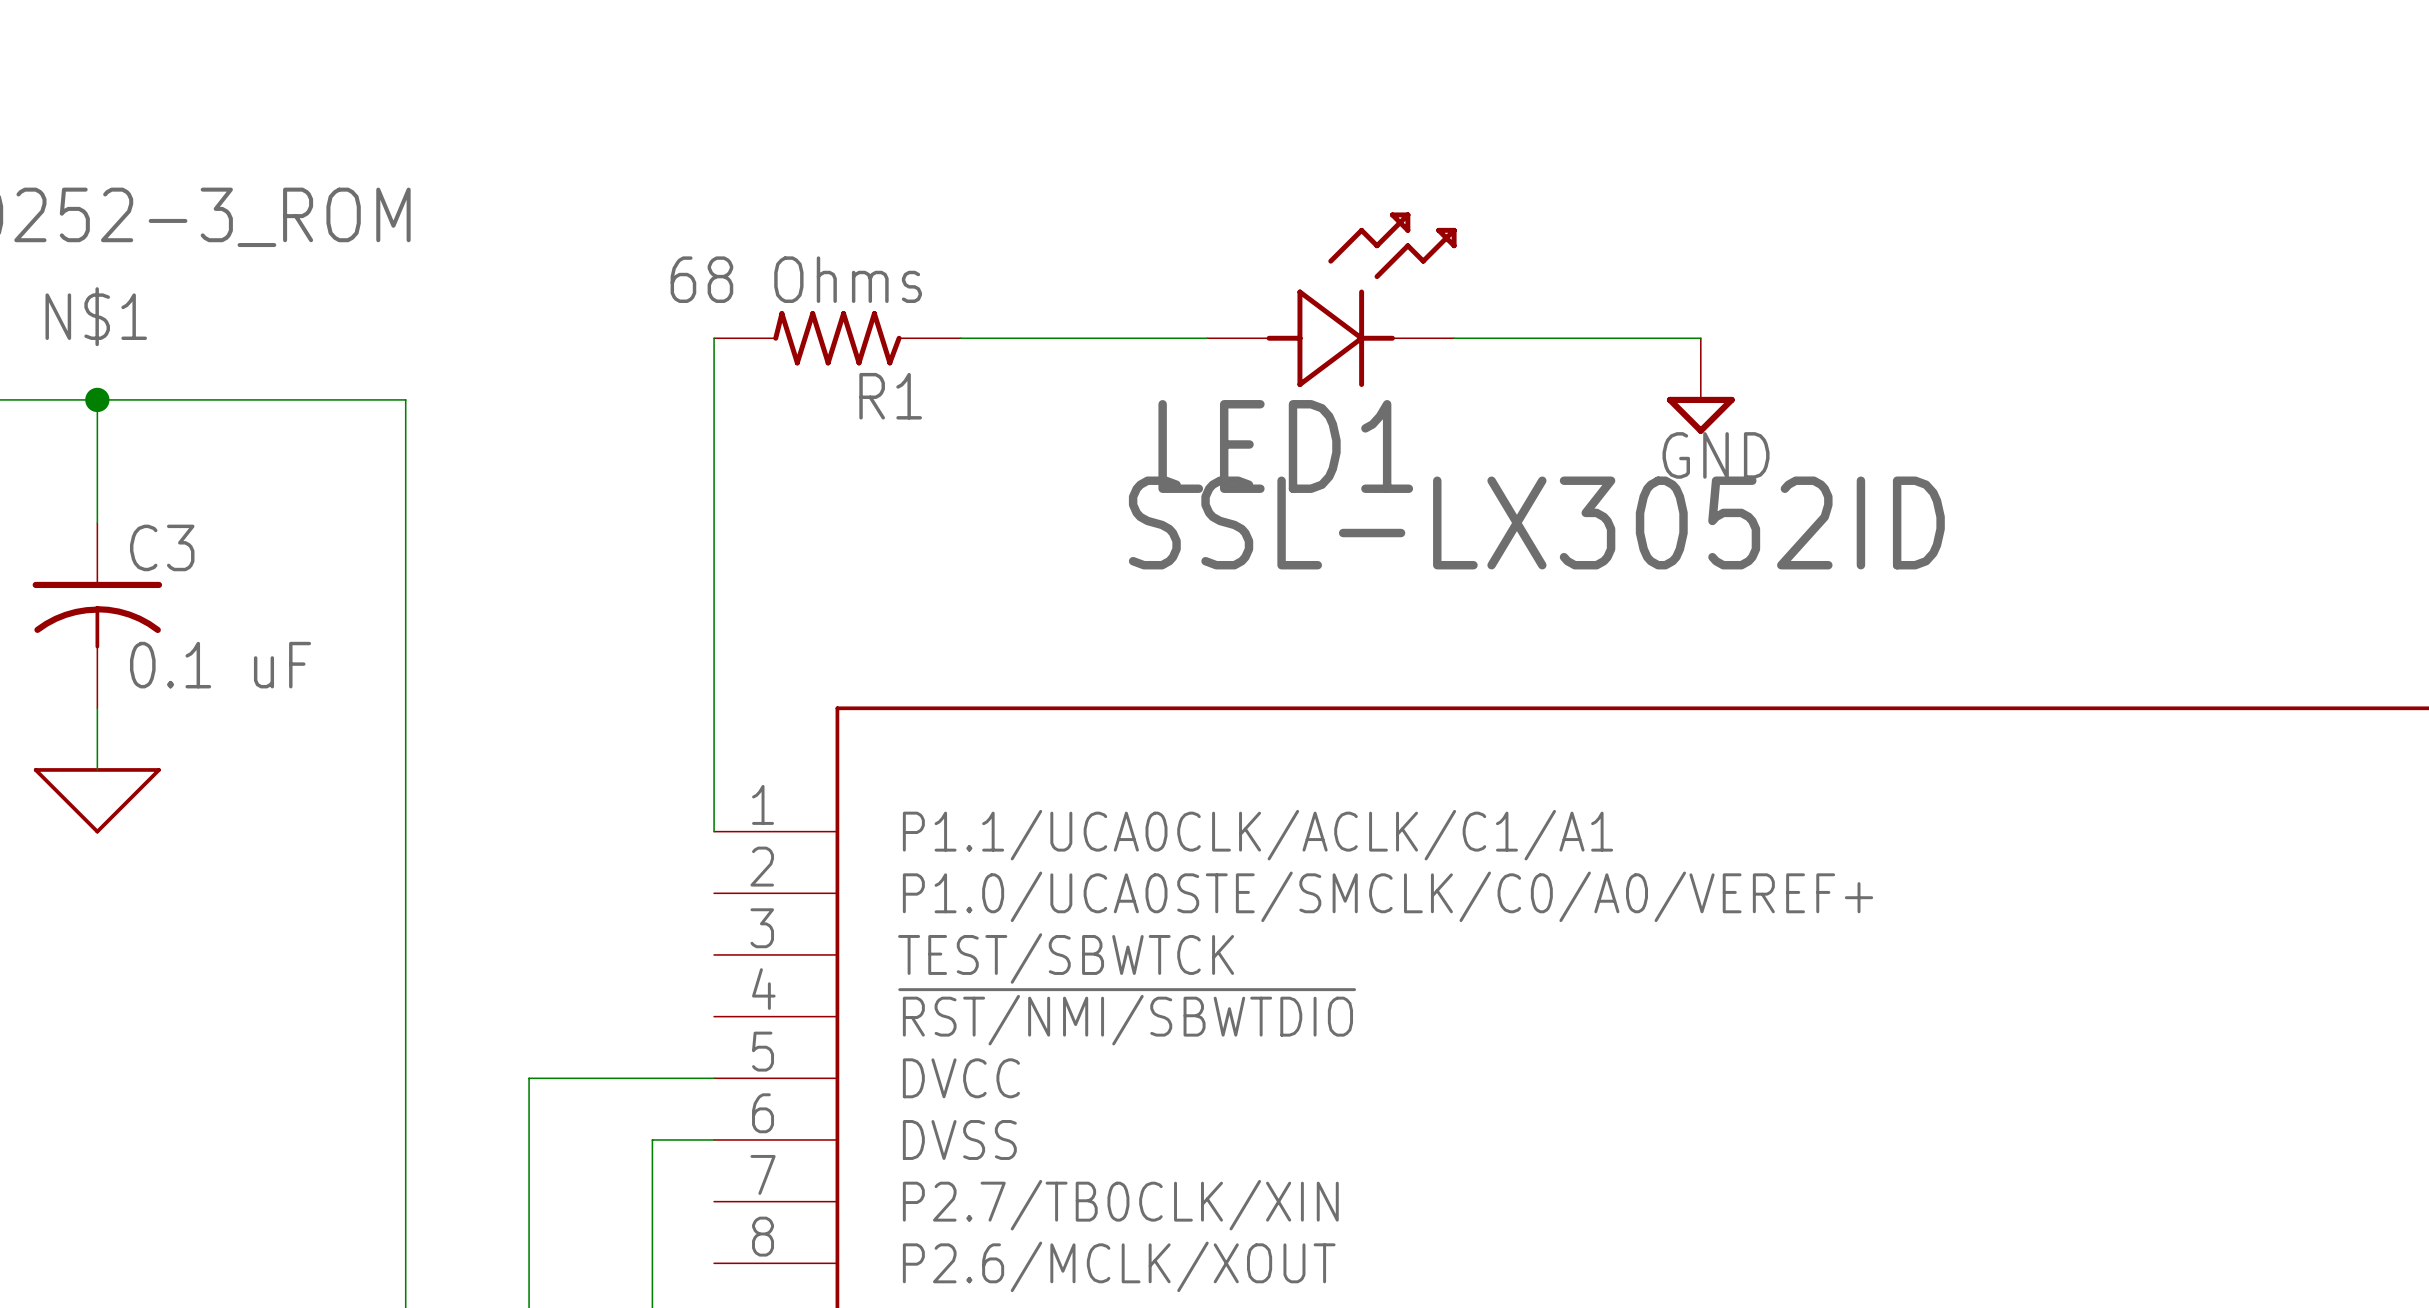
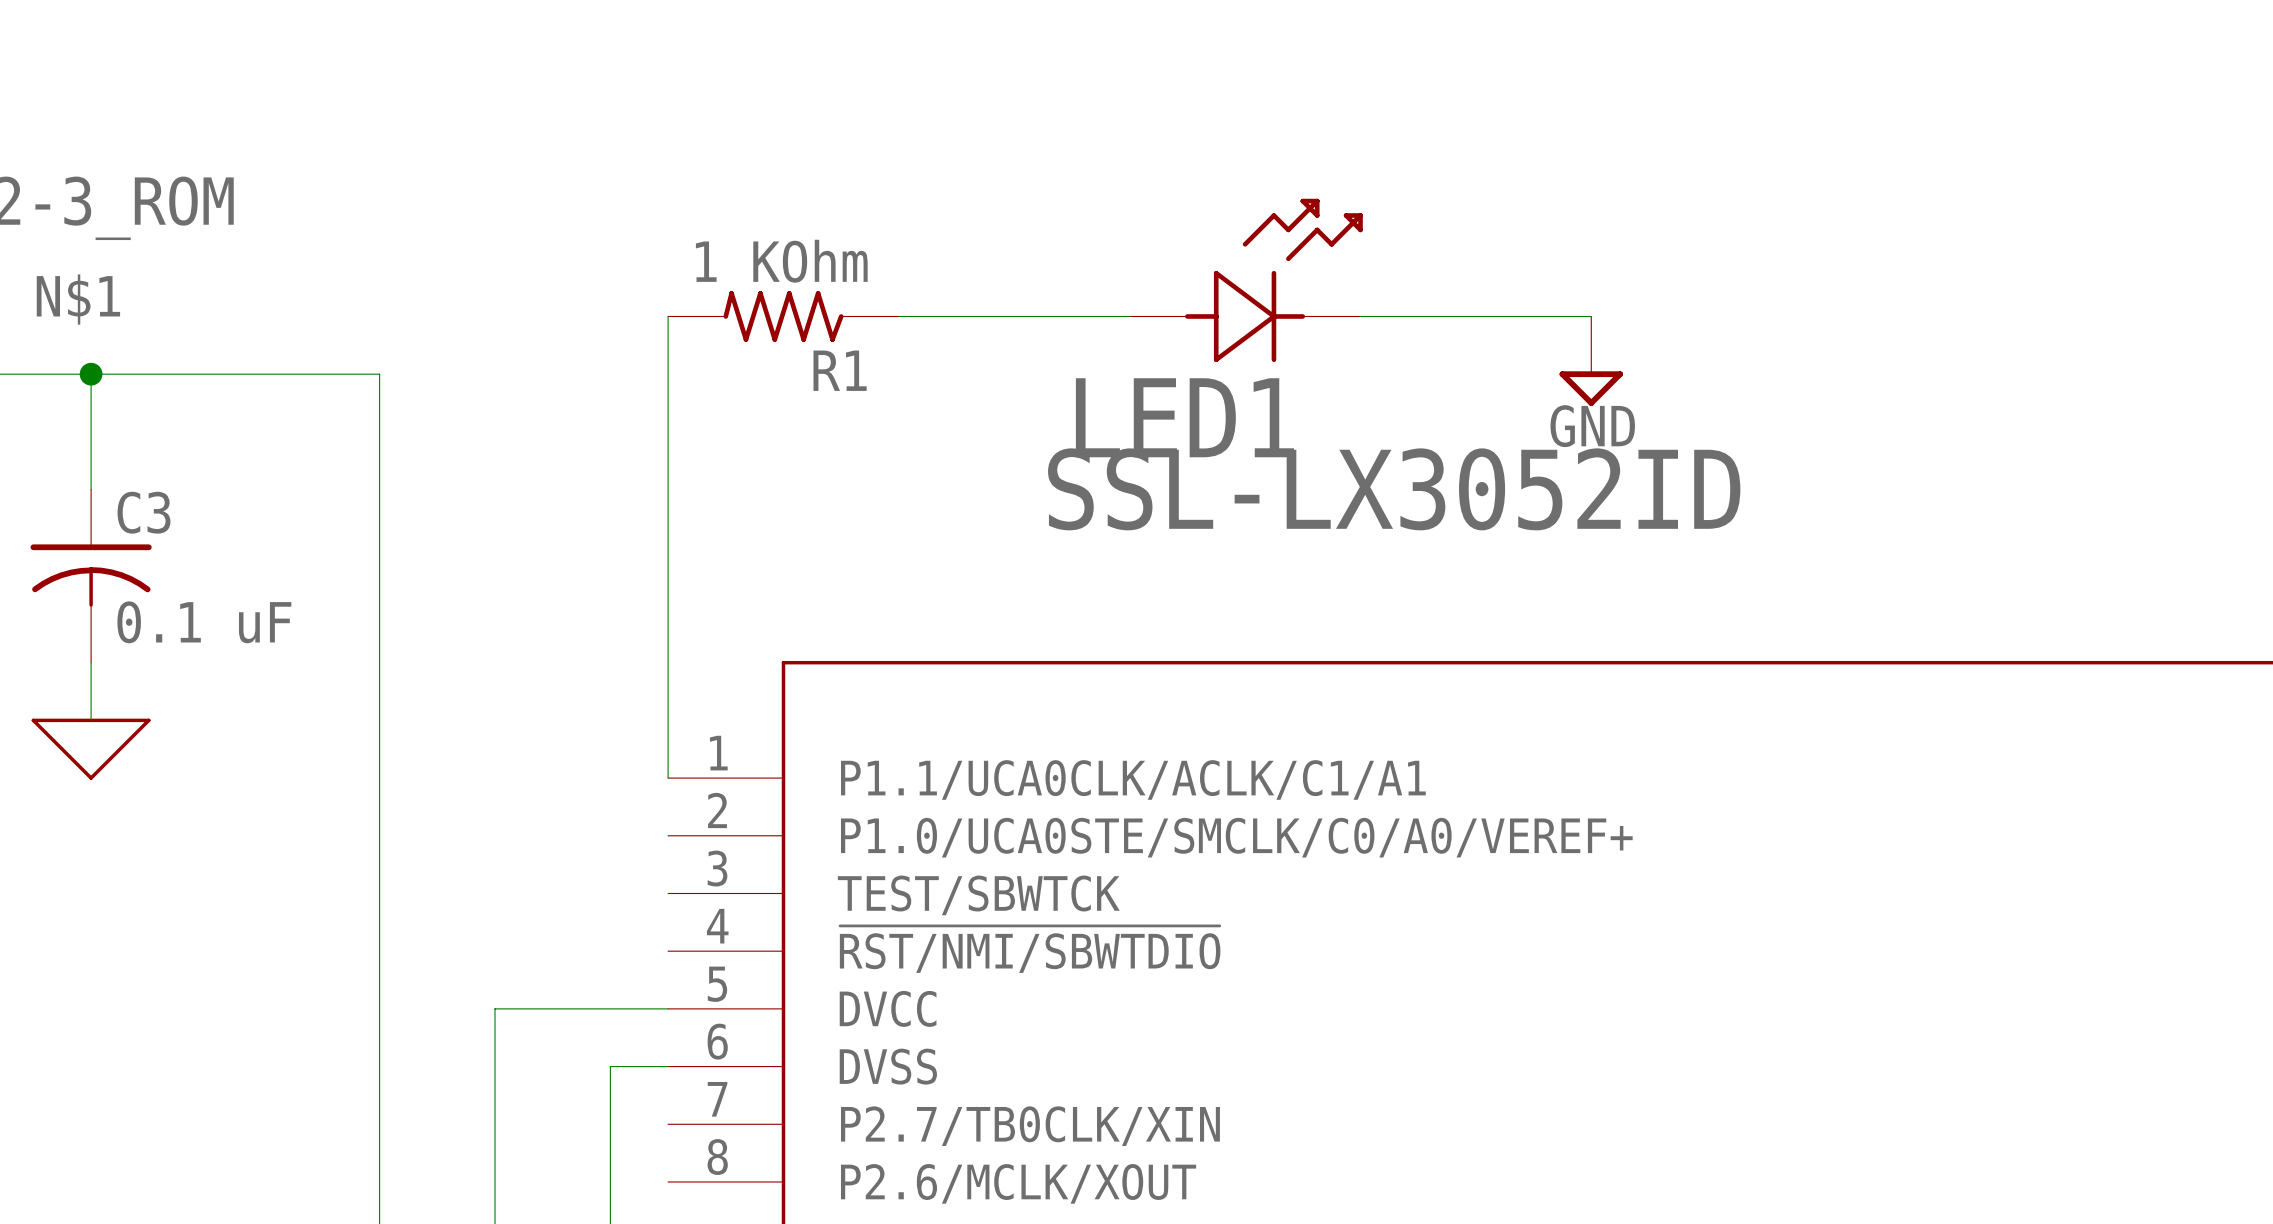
R1 value: 68 Ohms (796, 279) -> 1 KOhm (781, 261)

